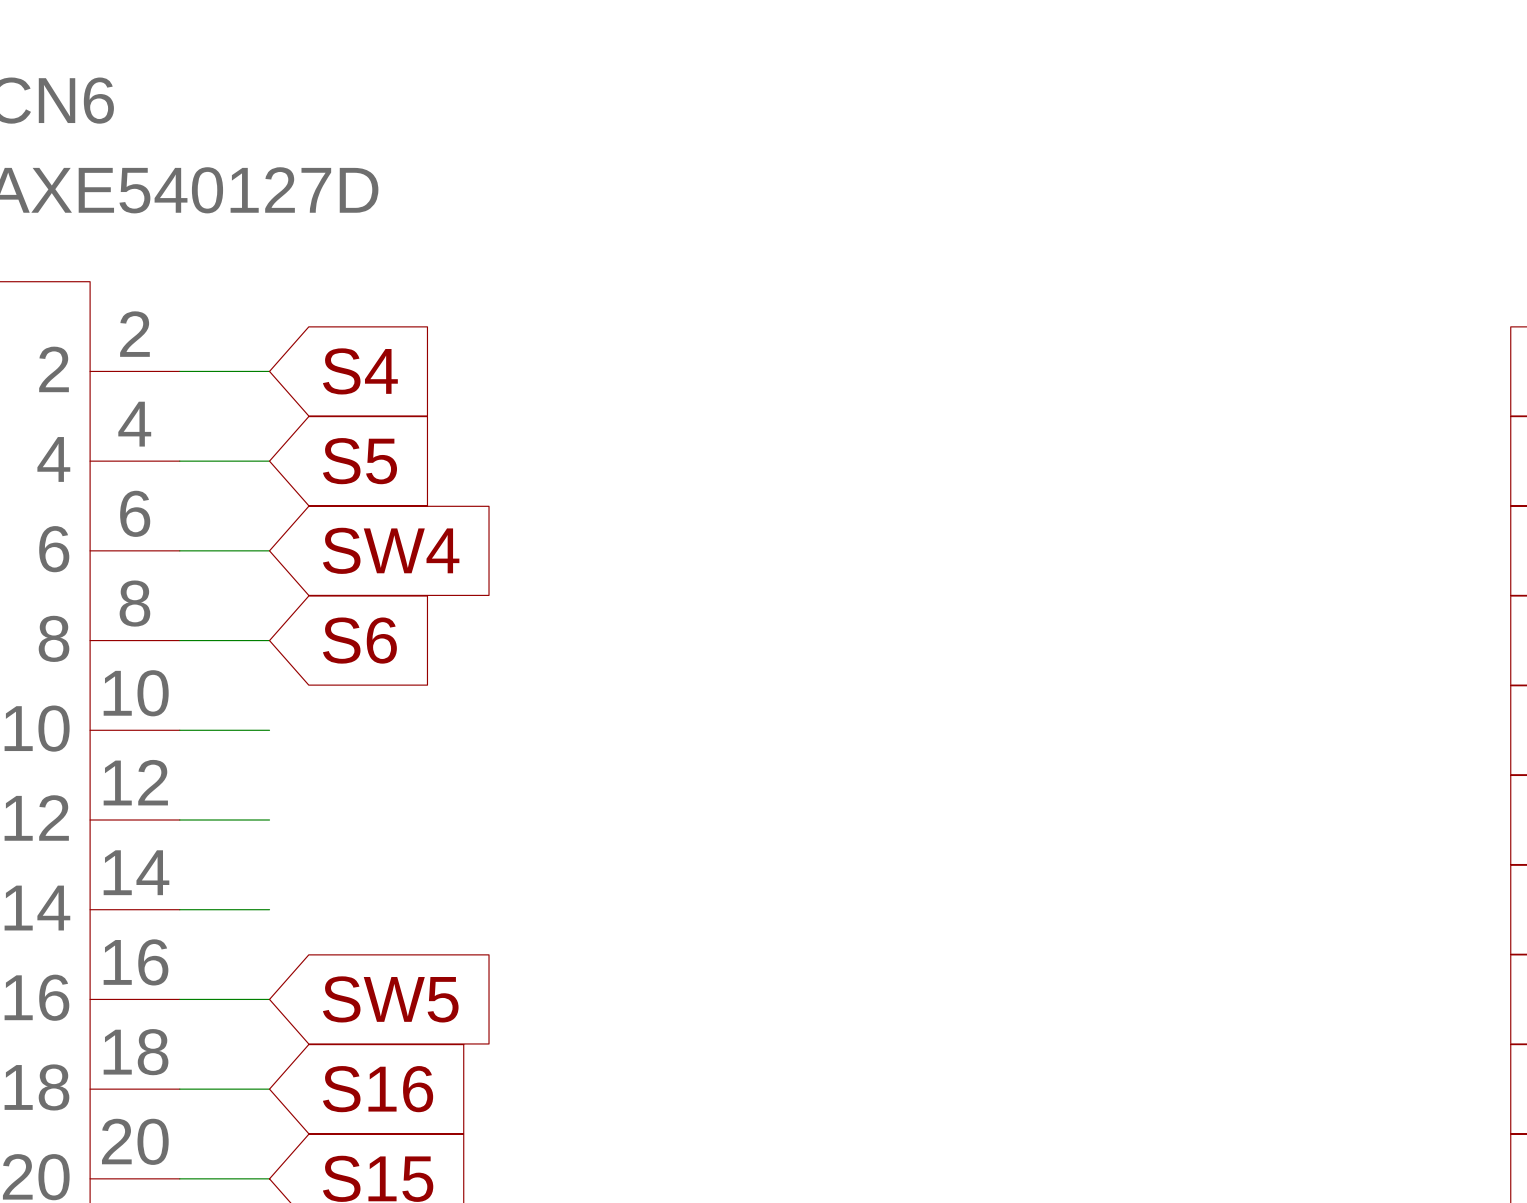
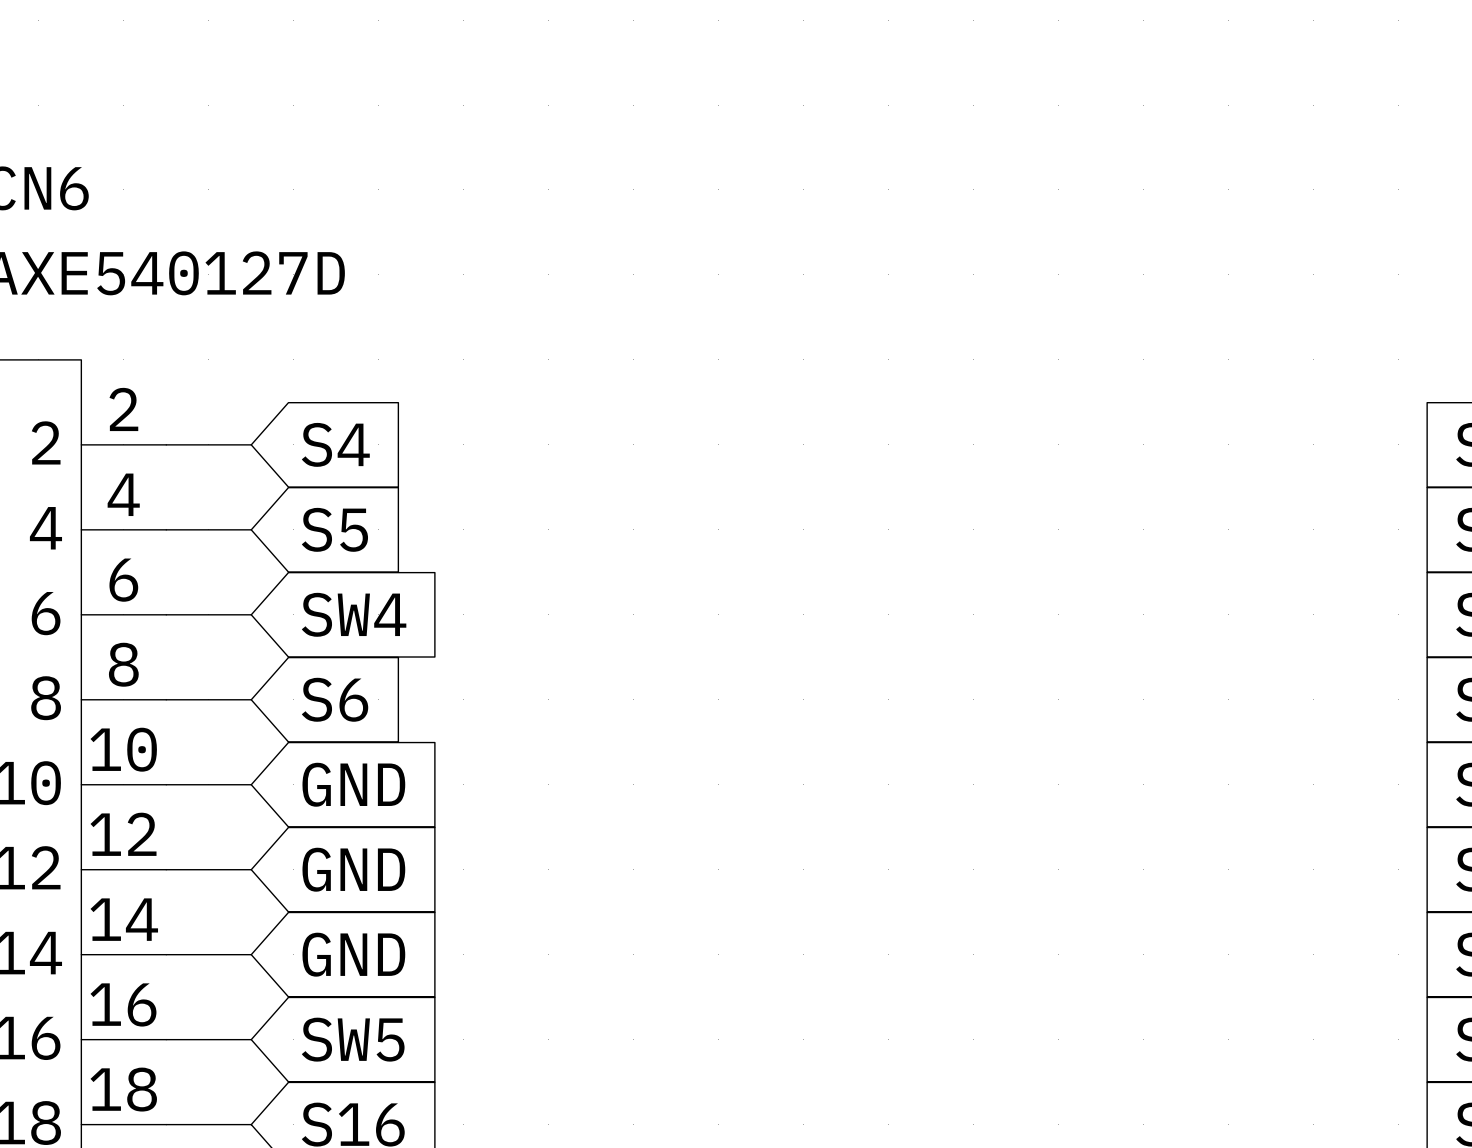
global label: none -> GND (353, 784)
global label: none -> GND (353, 869)
global label: none -> GND (353, 954)

